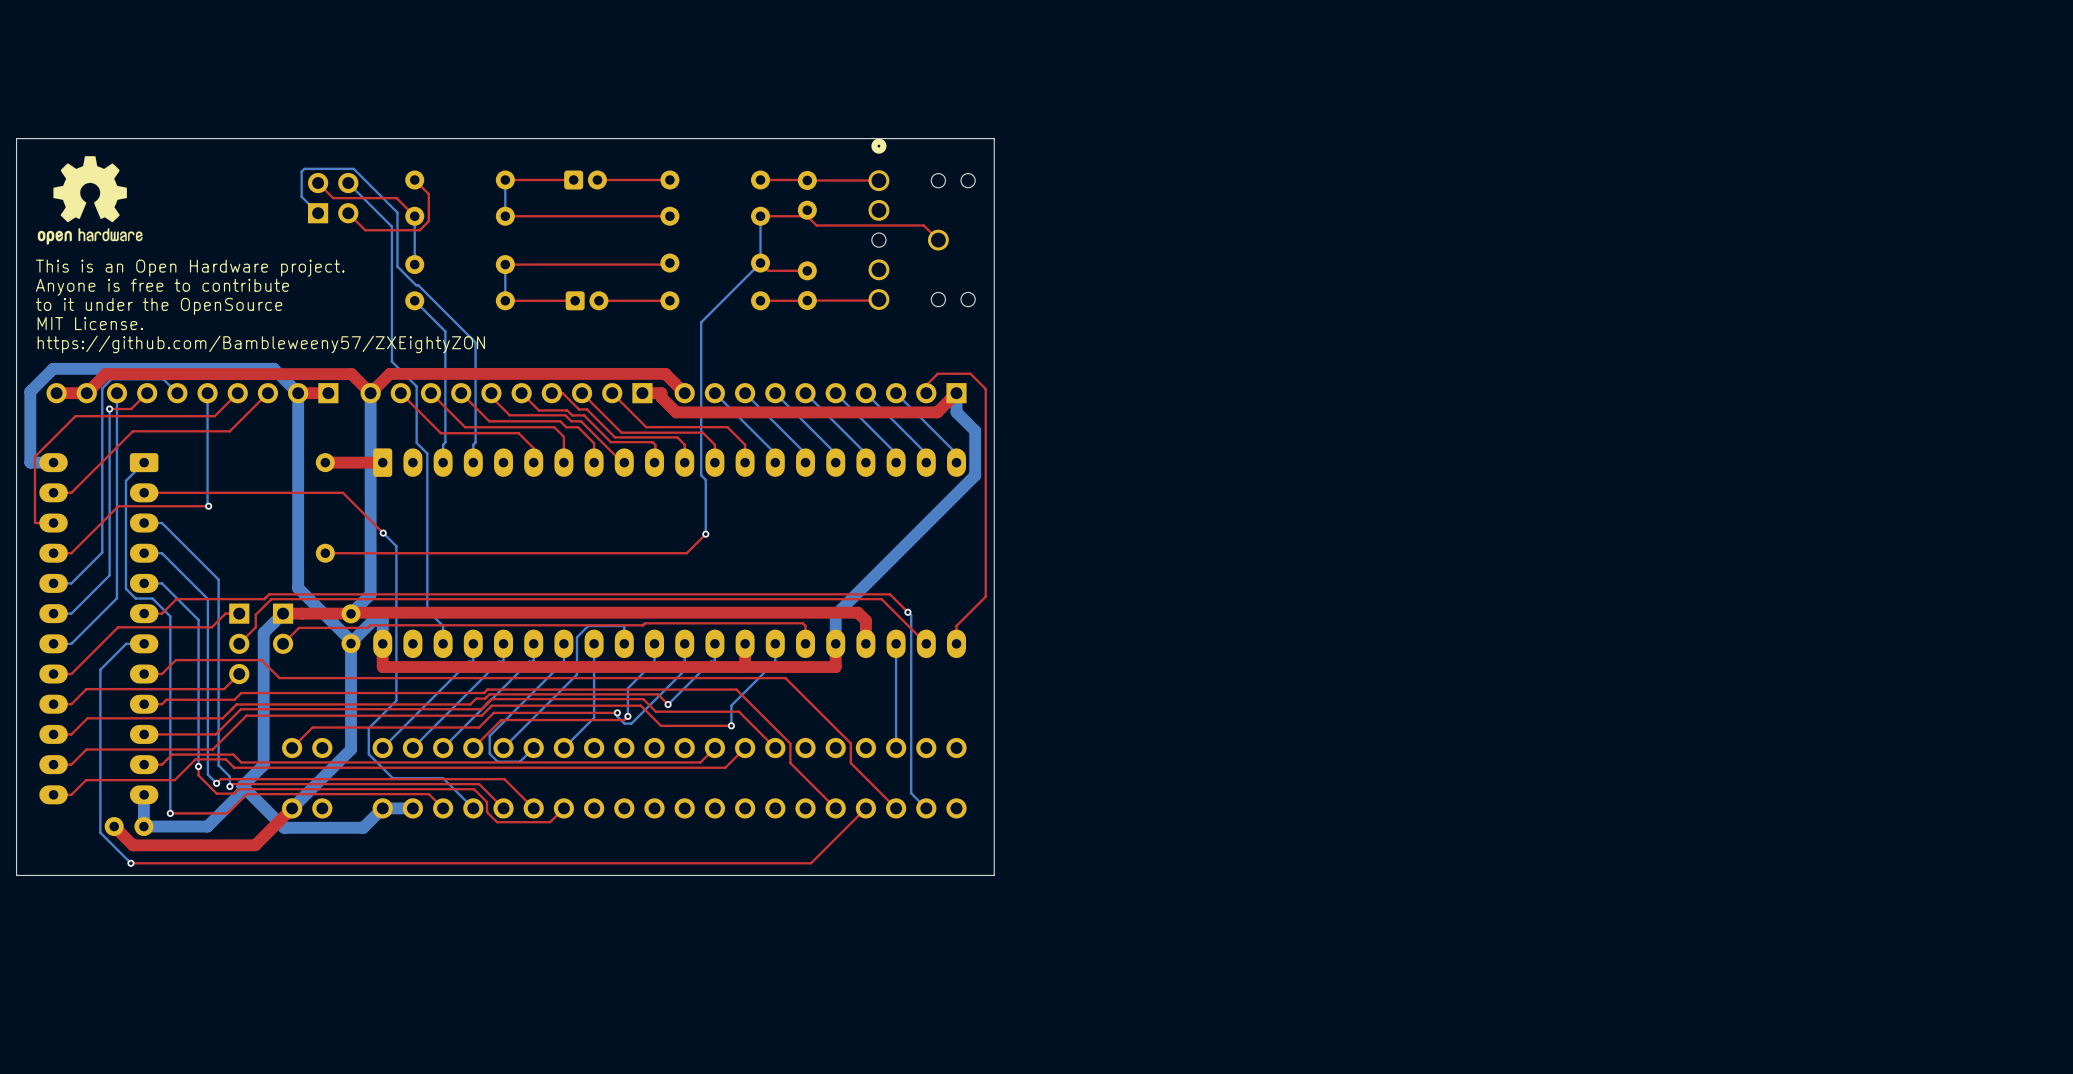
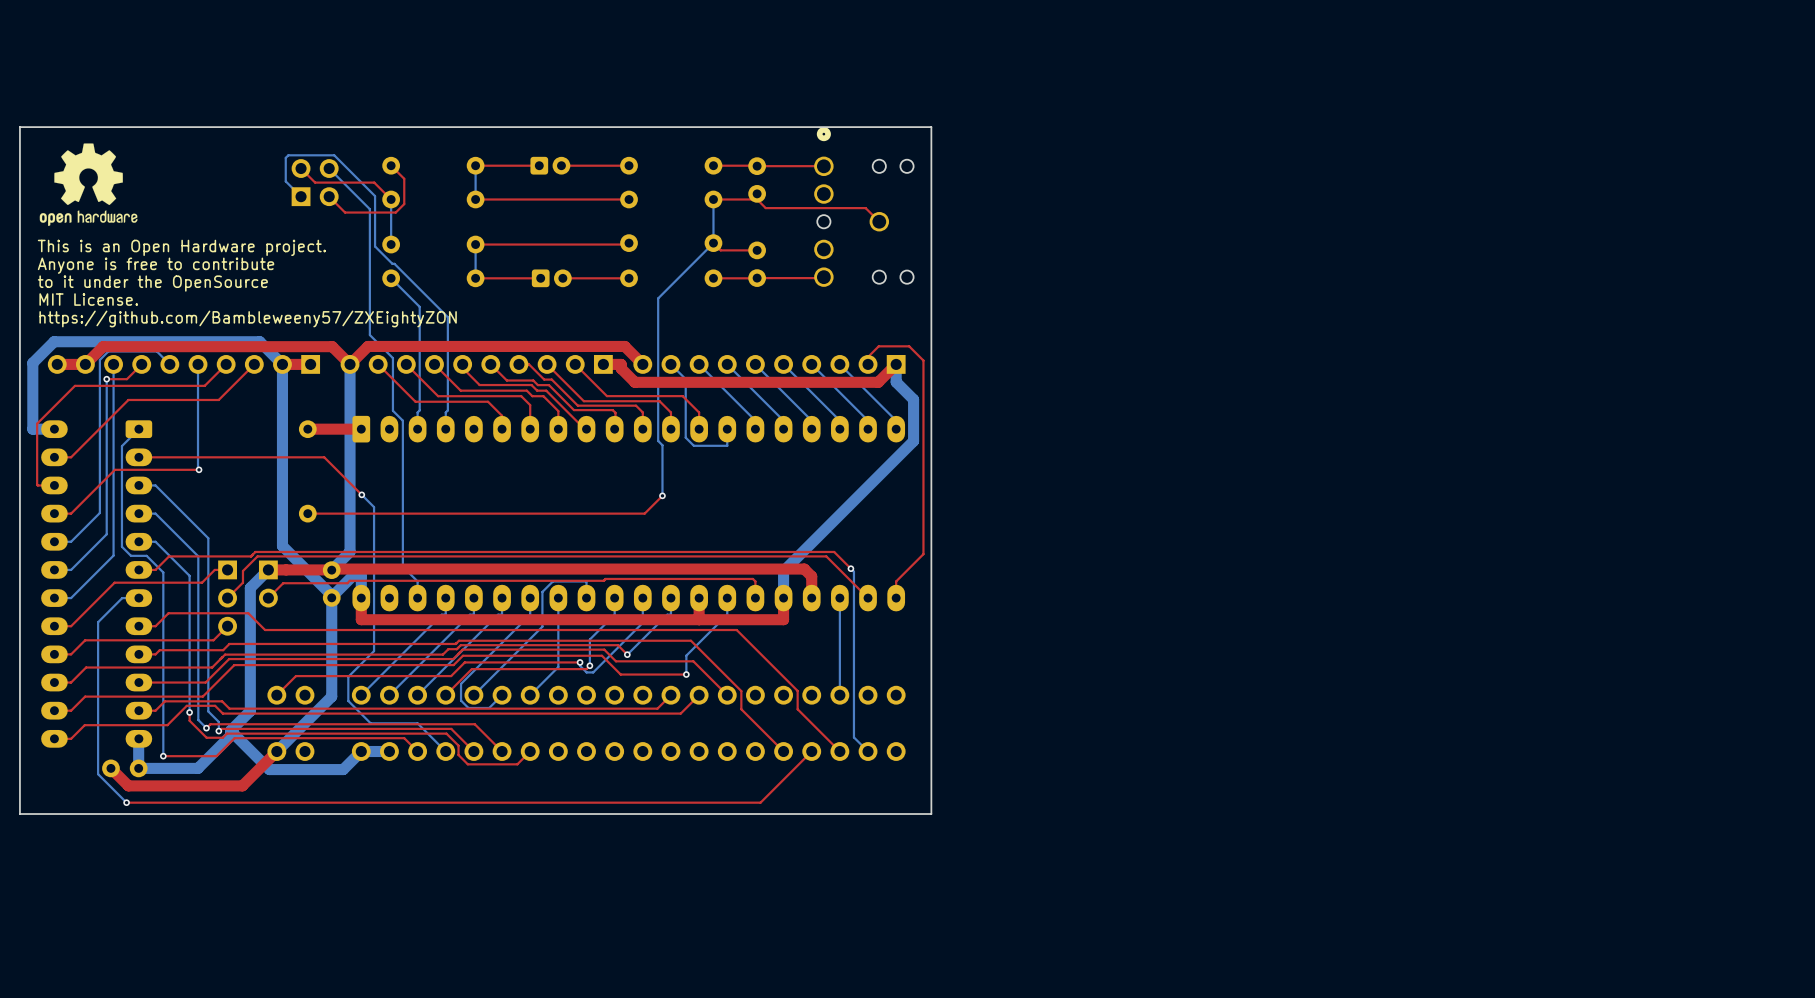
bottom track: (730, 409) (775, 453) (775, 462) -> (685, 379) (685, 437) (693, 445) (727, 445) (727, 429)

